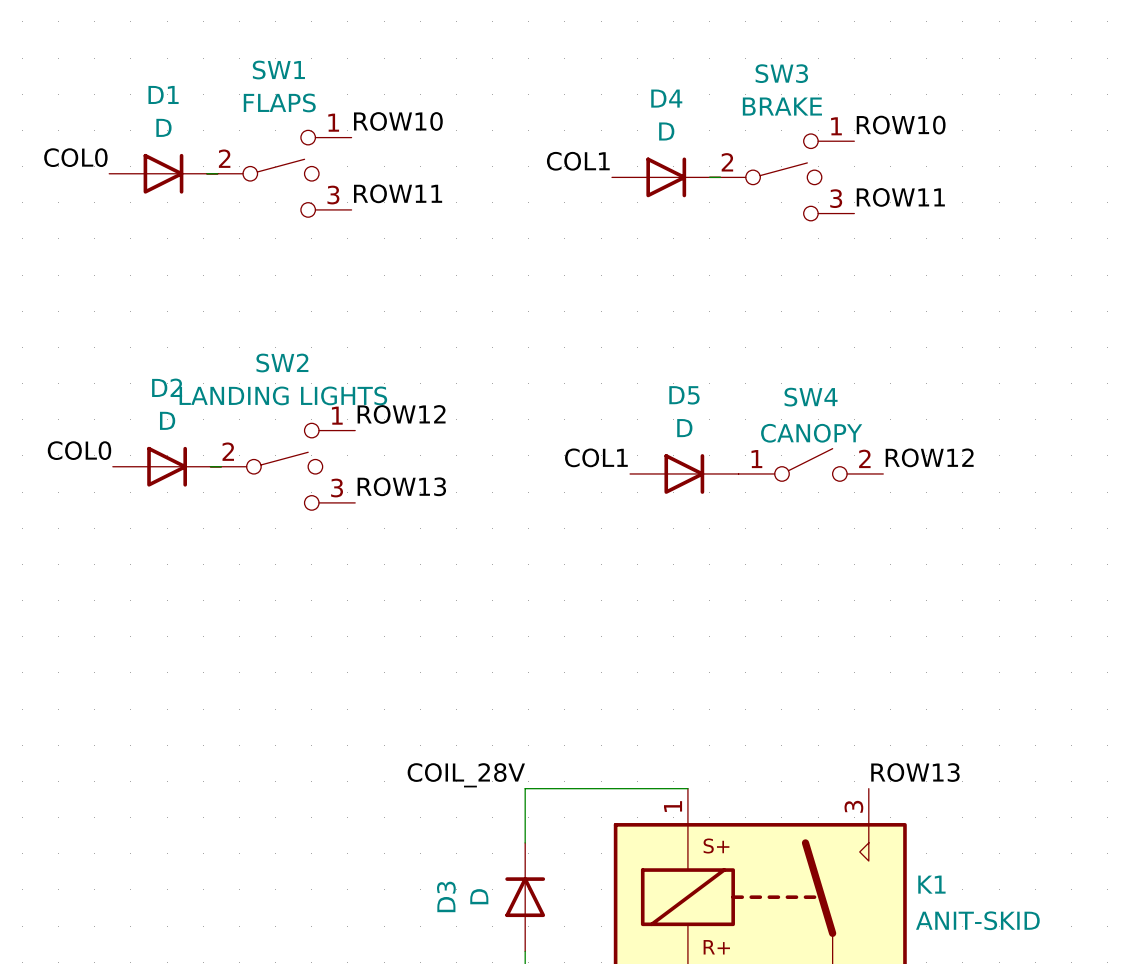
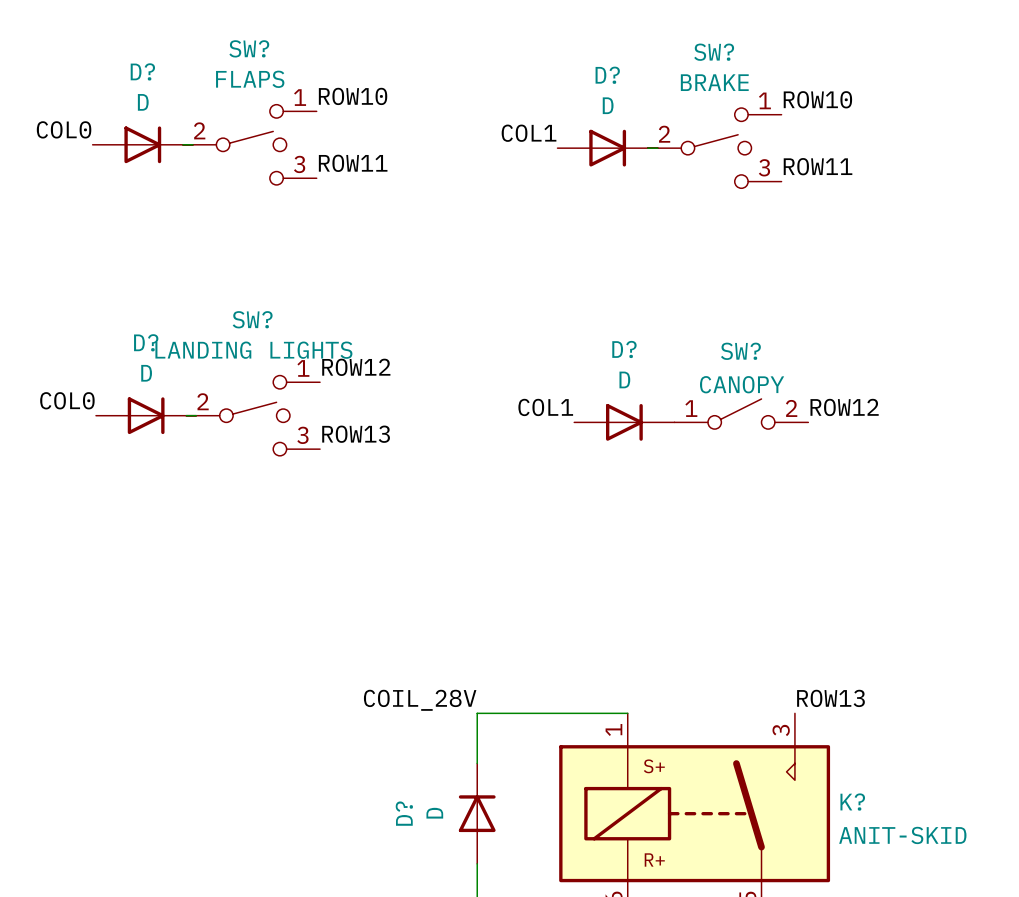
SW1 name: SW1 (278, 70) -> SW? (249, 48)
SW3 name: SW3 (781, 73) -> SW? (714, 52)
D1 name: D1 (163, 94) -> D? (142, 71)
D4 name: D4 (666, 98) -> D? (607, 75)
SW2 name: SW2 (282, 363) -> SW? (252, 319)
D2 name: D2 (167, 387) -> D? (146, 342)
D5 name: D5 (684, 395) -> D? (624, 349)
SW4 name: SW4 (811, 397) -> SW? (740, 351)
K1 name: K1 (931, 884) -> K? (852, 802)
D3 name: D3 (446, 896) -> D? (404, 813)

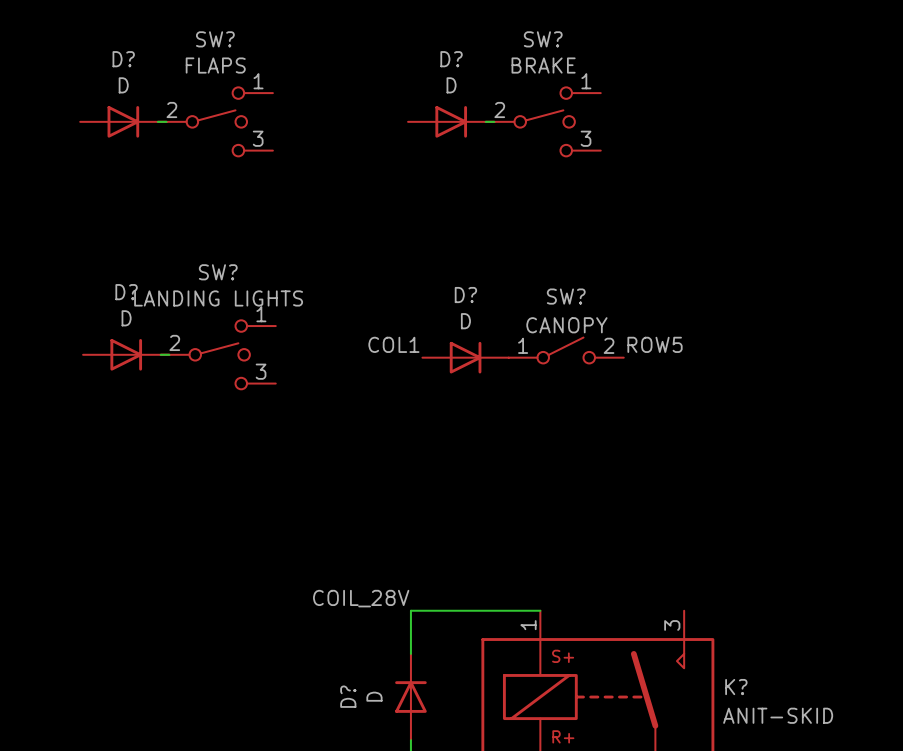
label: ROW10 (353, 96) -> none
label: ROW10 (817, 99) -> none
label: COL0 (64, 129) -> none
label: COL1 (529, 133) -> none
D? position: (607, 148) -> (451, 121)
wire: (647, 148) (657, 148) -> (485, 121) (494, 121)
SW? position: (714, 148) -> (543, 121)
label: ROW11 (353, 163) -> none
label: ROW11 (818, 166) -> none
label: ROW12 (356, 367) -> none
label: COL0 (67, 400) -> none
label position: COL1 (545, 407) -> COL1 (393, 344)
label: ROW12 (844, 407) -> ROW5 (655, 344)
SW? position: (741, 414) -> (566, 350)
D? position: (624, 422) -> (465, 357)
label: ROW13 (356, 434) -> none
label: ROW13 (830, 698) -> none

